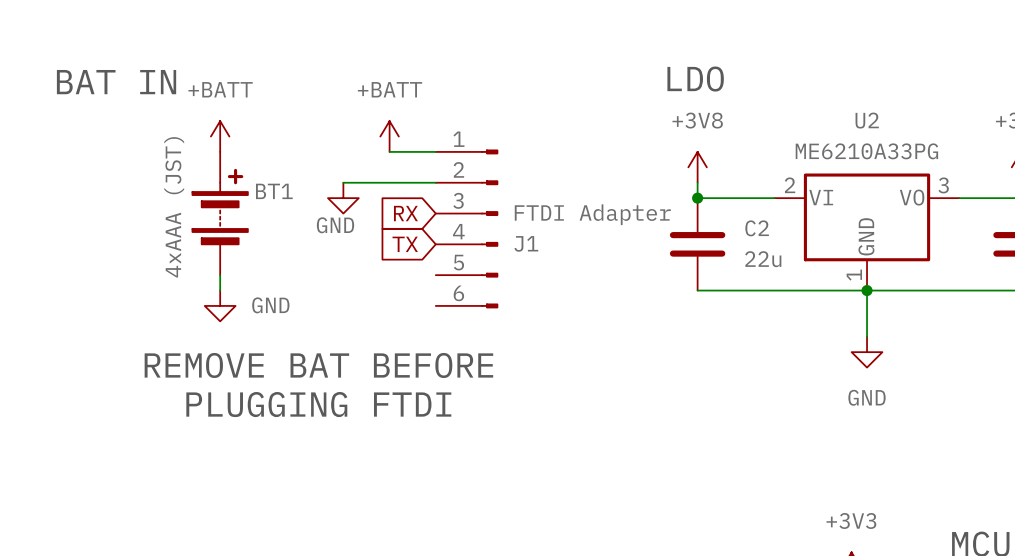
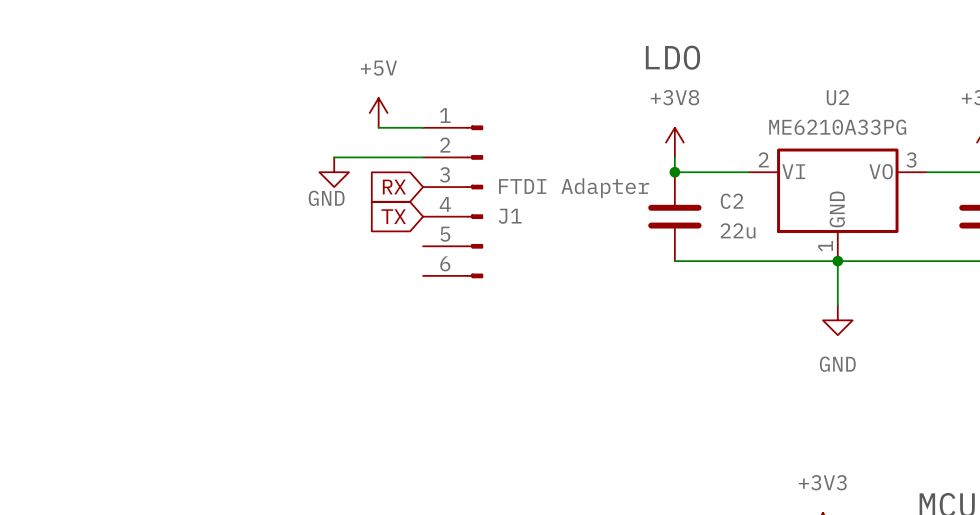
text: BAT IN (116, 82) -> none
power symbol: +BATT (220, 136) -> none
power symbol: +BATT (389, 136) -> +5V (378, 112)
BT1: 4xAAA (JST) (220, 213) -> none
wire: (220, 275) (220, 290) -> none
power symbol: GND (220, 305) -> none
text: REMOVE BAT BEFORE (318, 365) -> none
text: PLUGGING FTDI (318, 404) -> none

